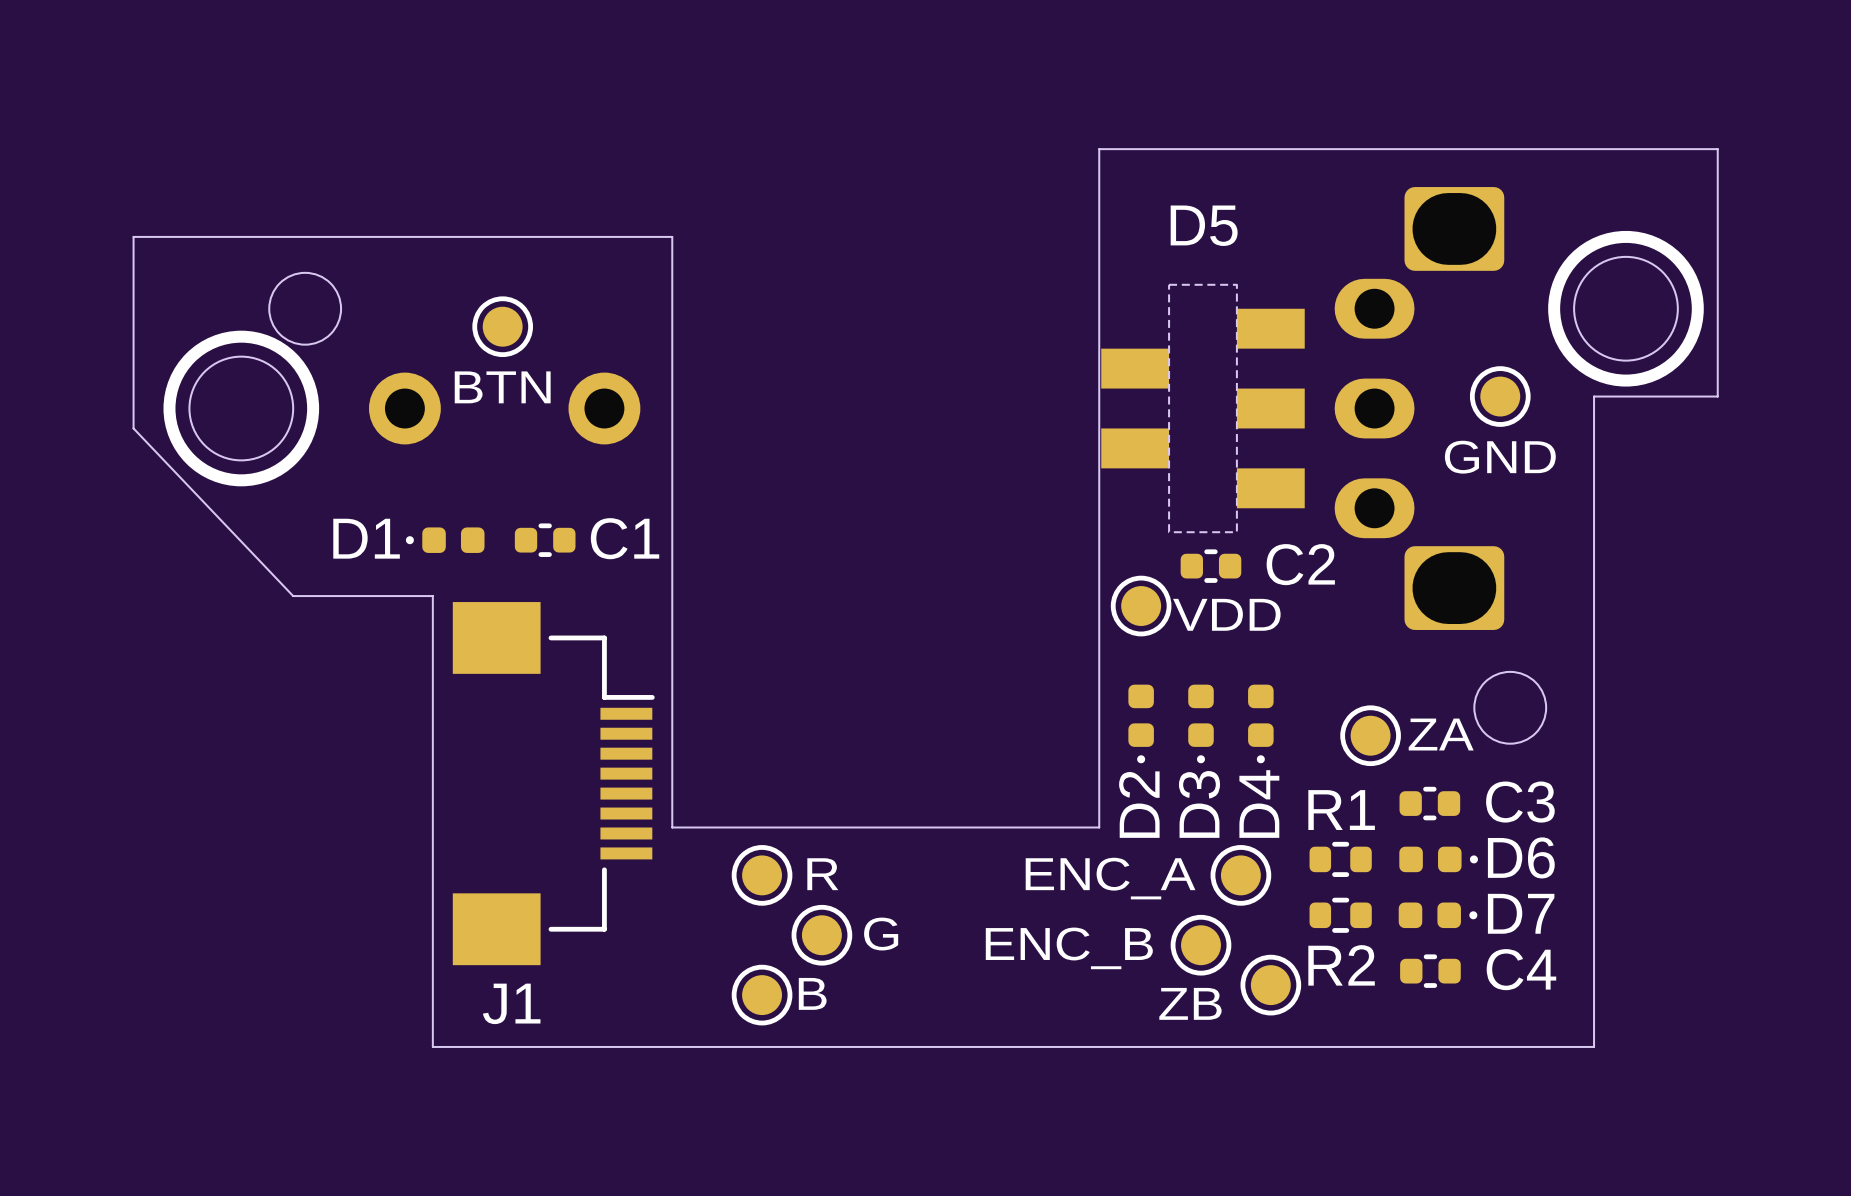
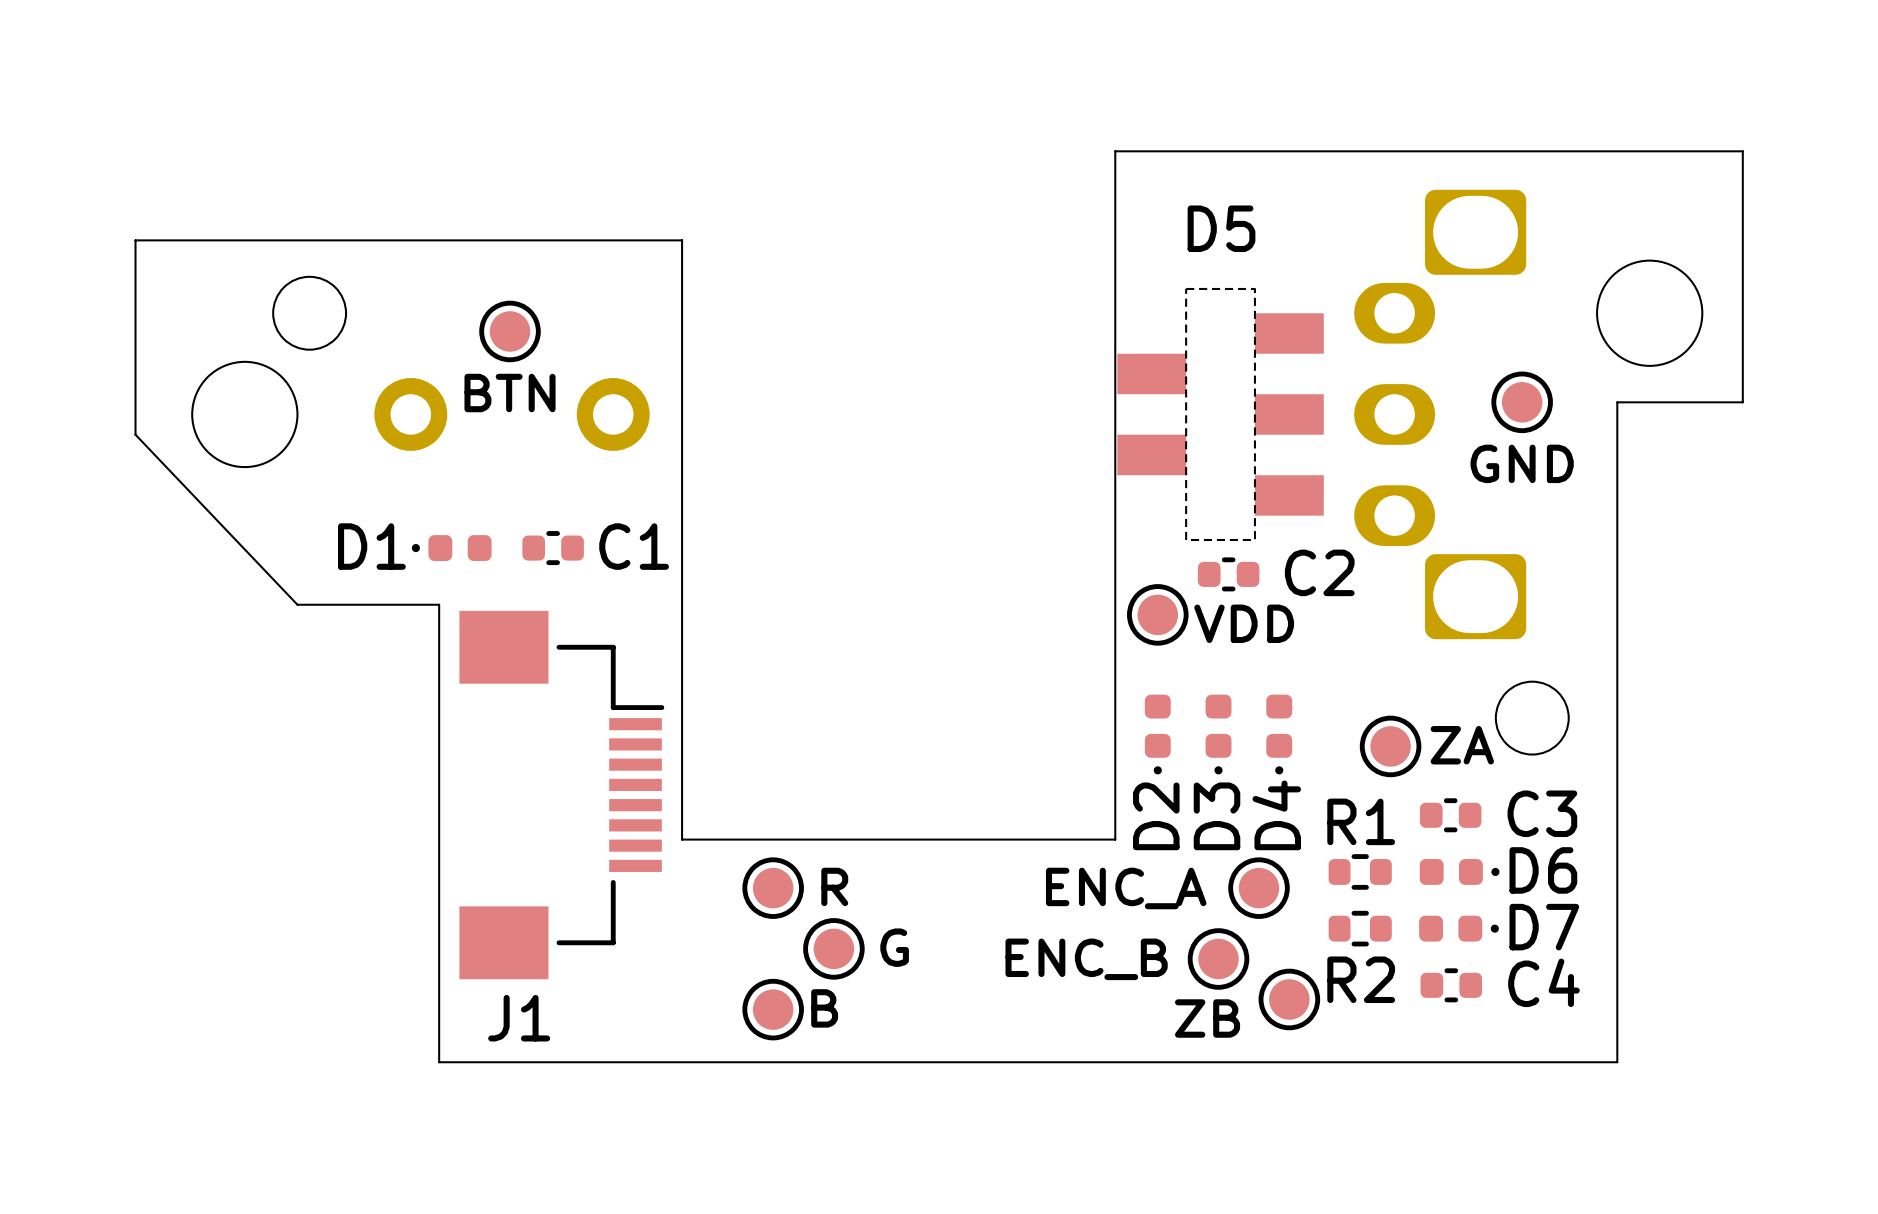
drawing: [1548, 230, 1704, 387] -> none
drawing: [163, 330, 320, 487] -> none

